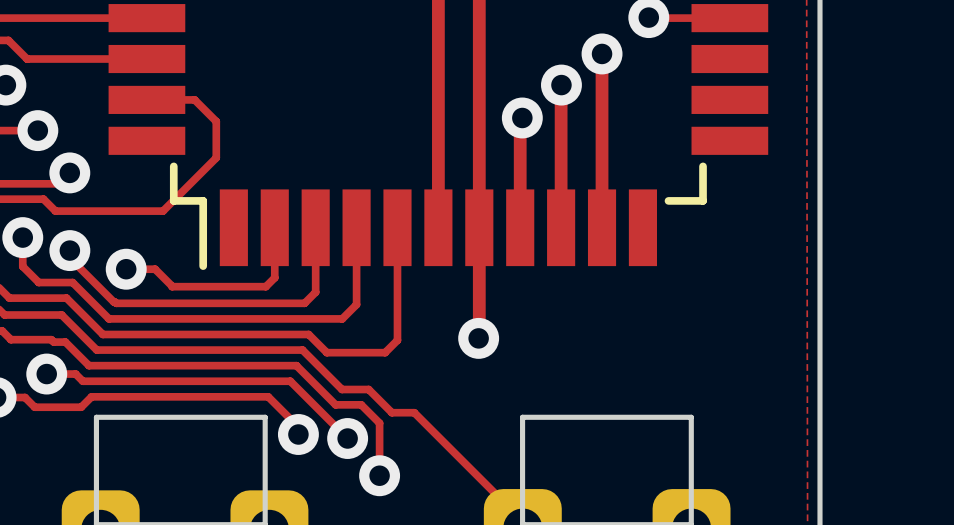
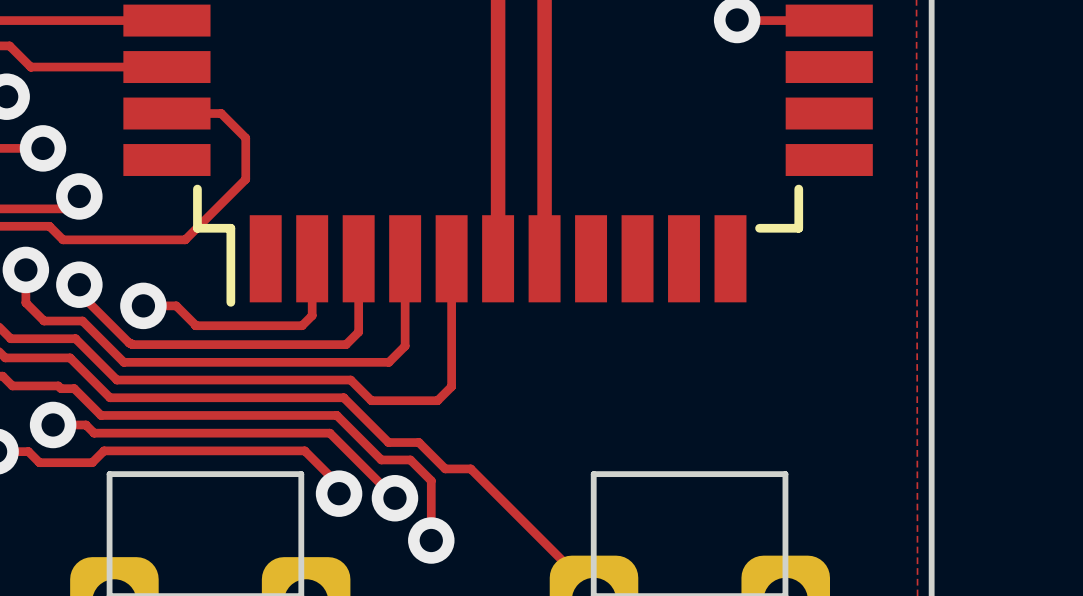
track: (602, 53) (602, 227) -> none
via: (602, 53) -> none
track: (561, 85) (561, 227) -> none
via: (561, 85) -> none
track: (522, 117) (520, 120) (520, 227) -> none
via: (522, 117) -> none
track: (479, 227) (479, 337) -> none
via: (478, 338) -> none

